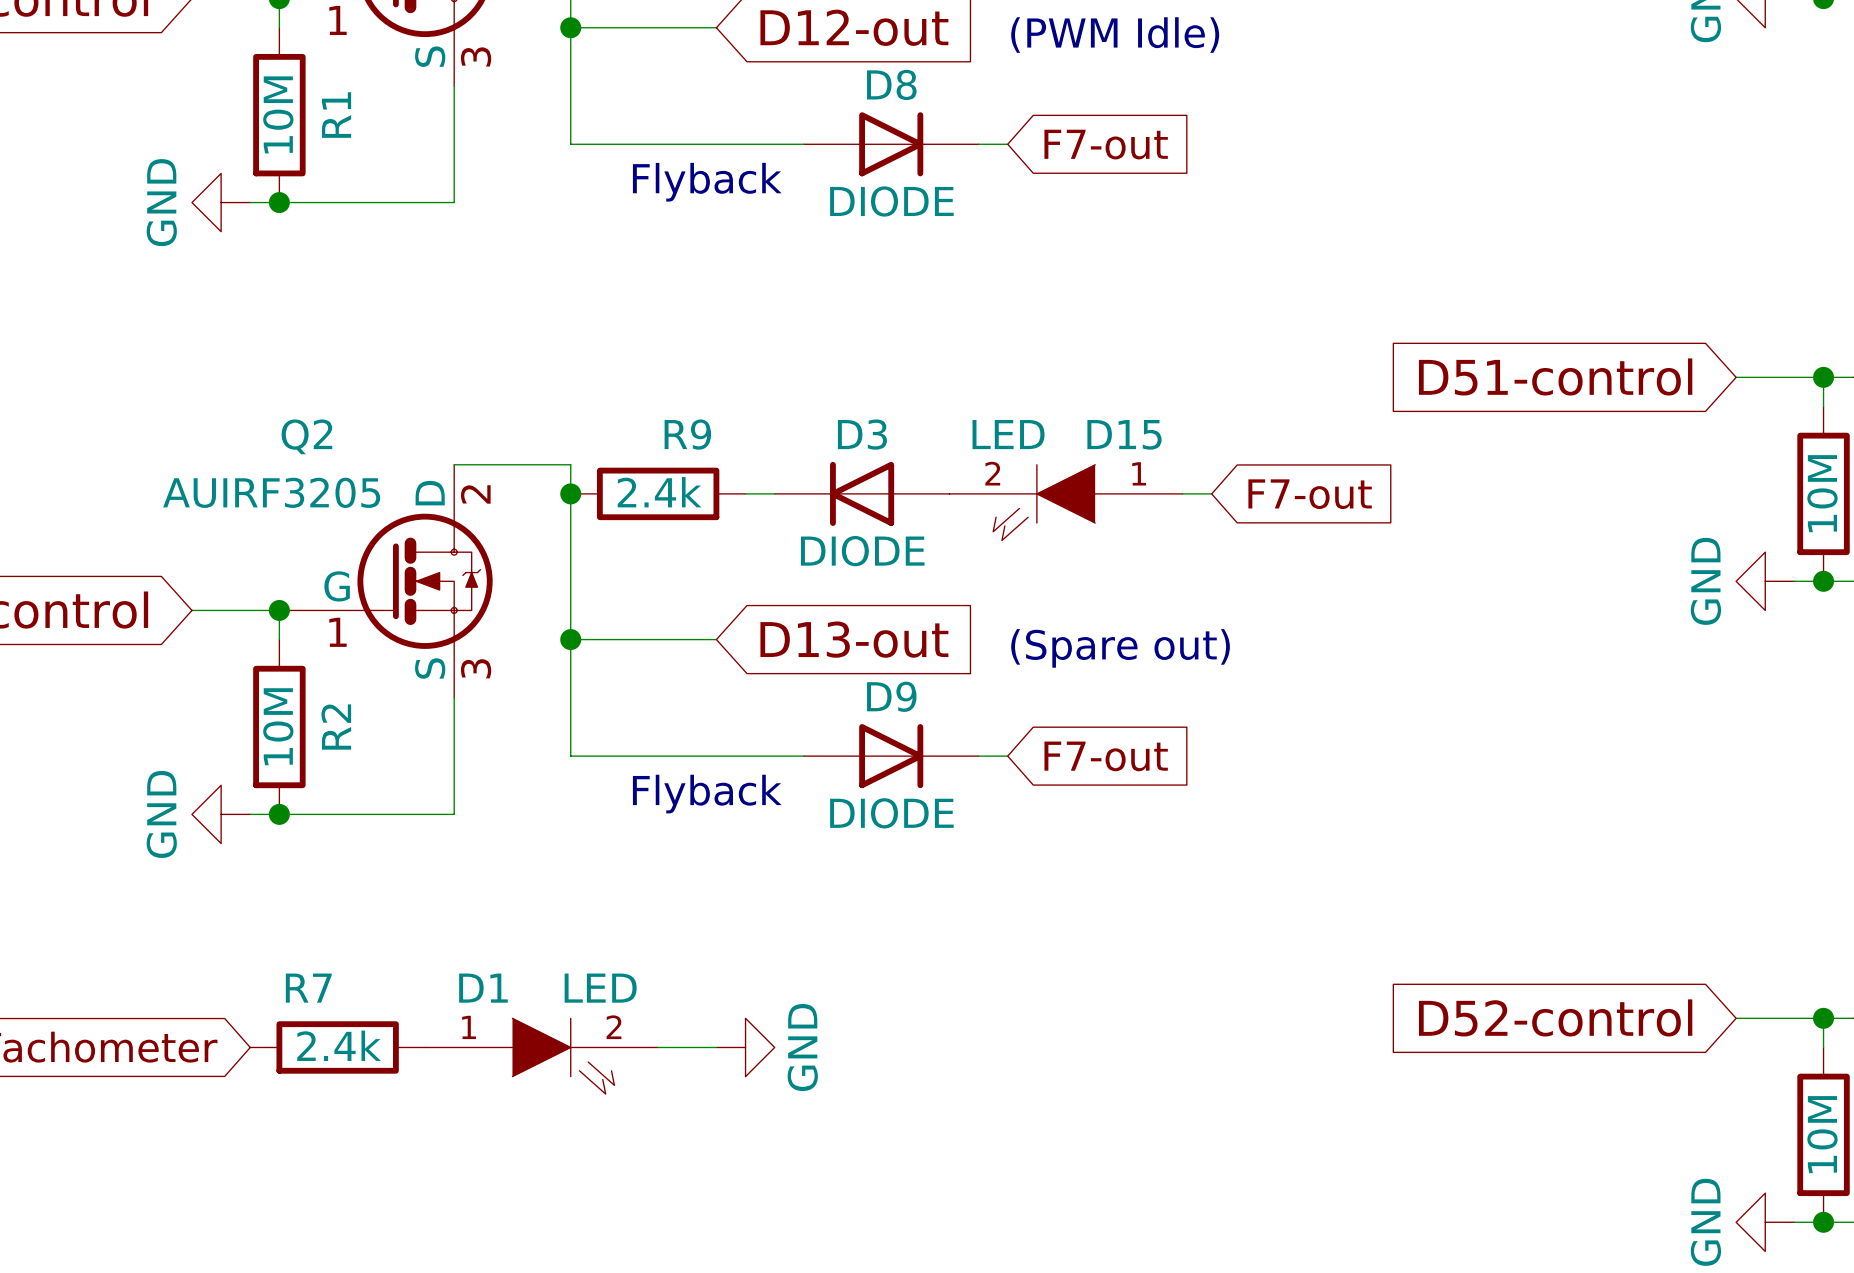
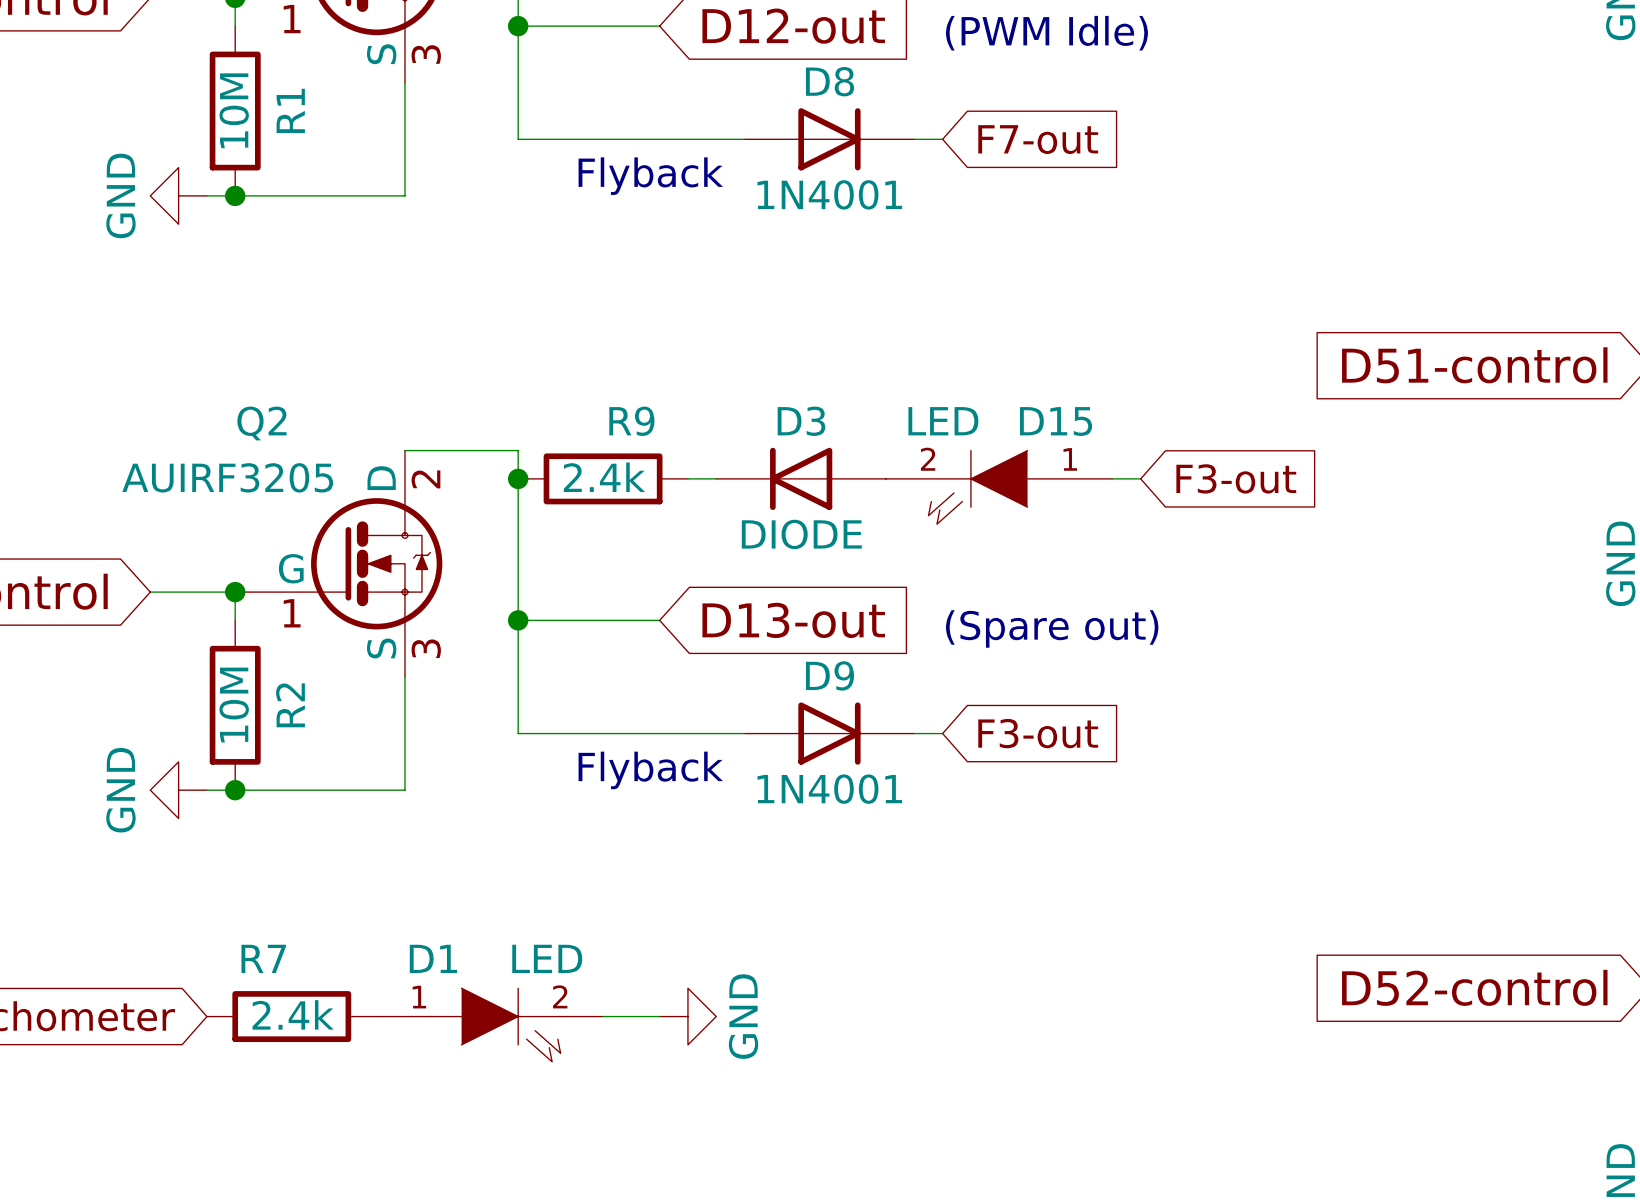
D8 value: DIODE (891, 201) -> 1N4001 (829, 194)
global label: F7-out (1310, 494) -> F3-out (1236, 478)
global label: F7-out (1106, 756) -> F3-out (1038, 733)
D9 value: DIODE (891, 813) -> 1N4001 (829, 789)

